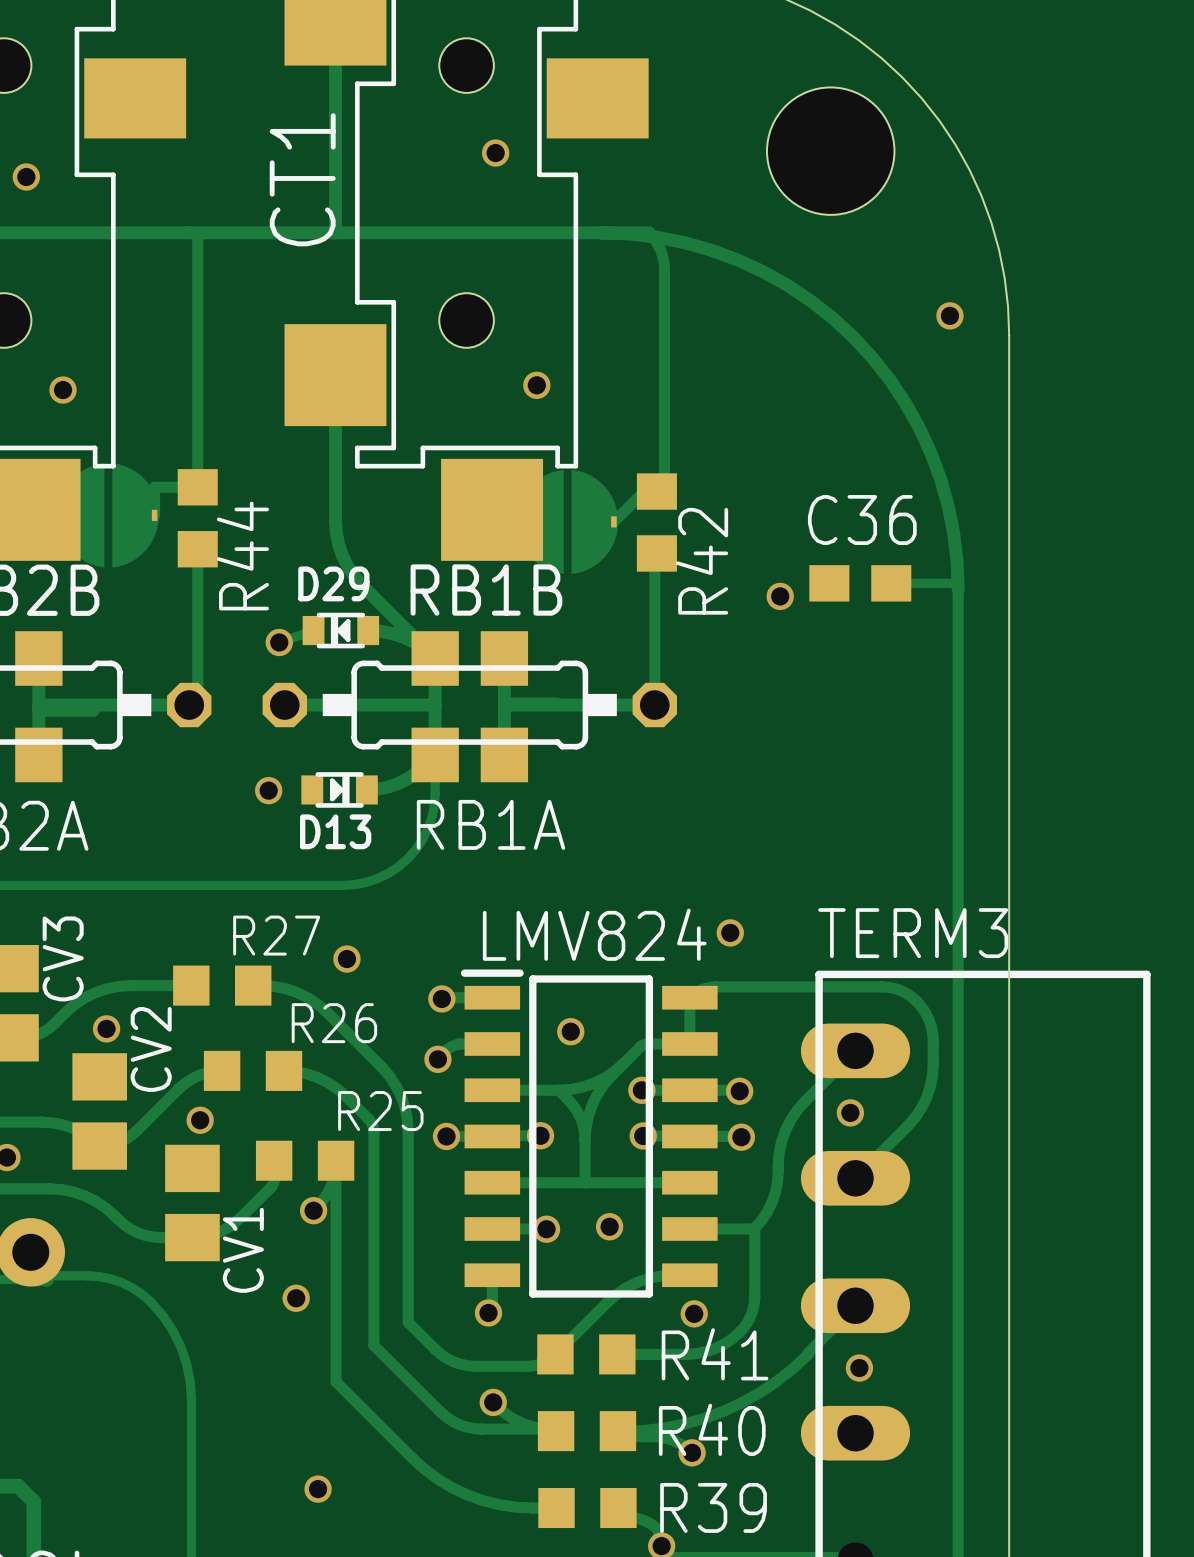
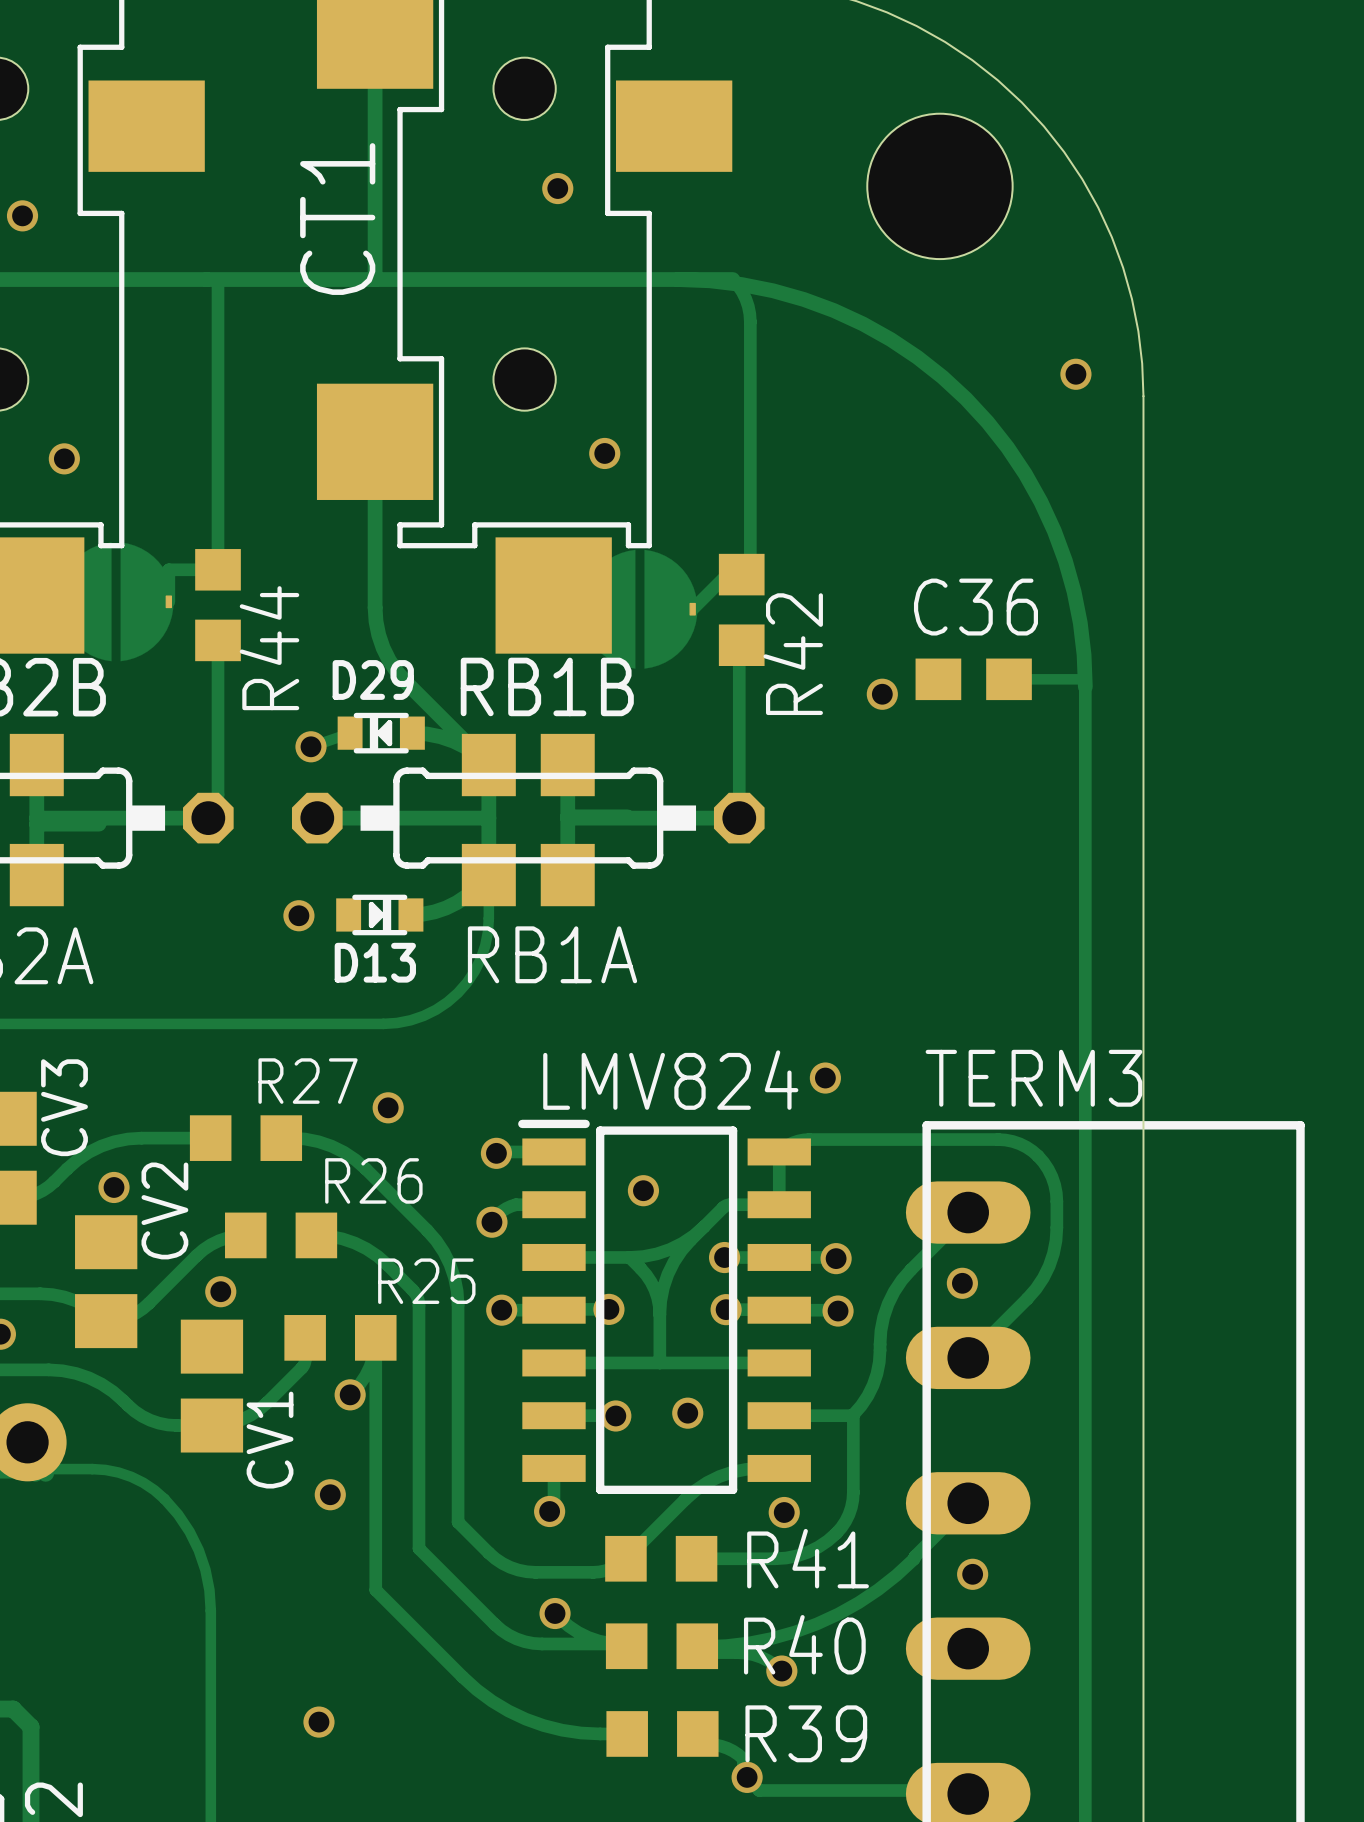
via position: (318, 1489) -> (318, 1722)

